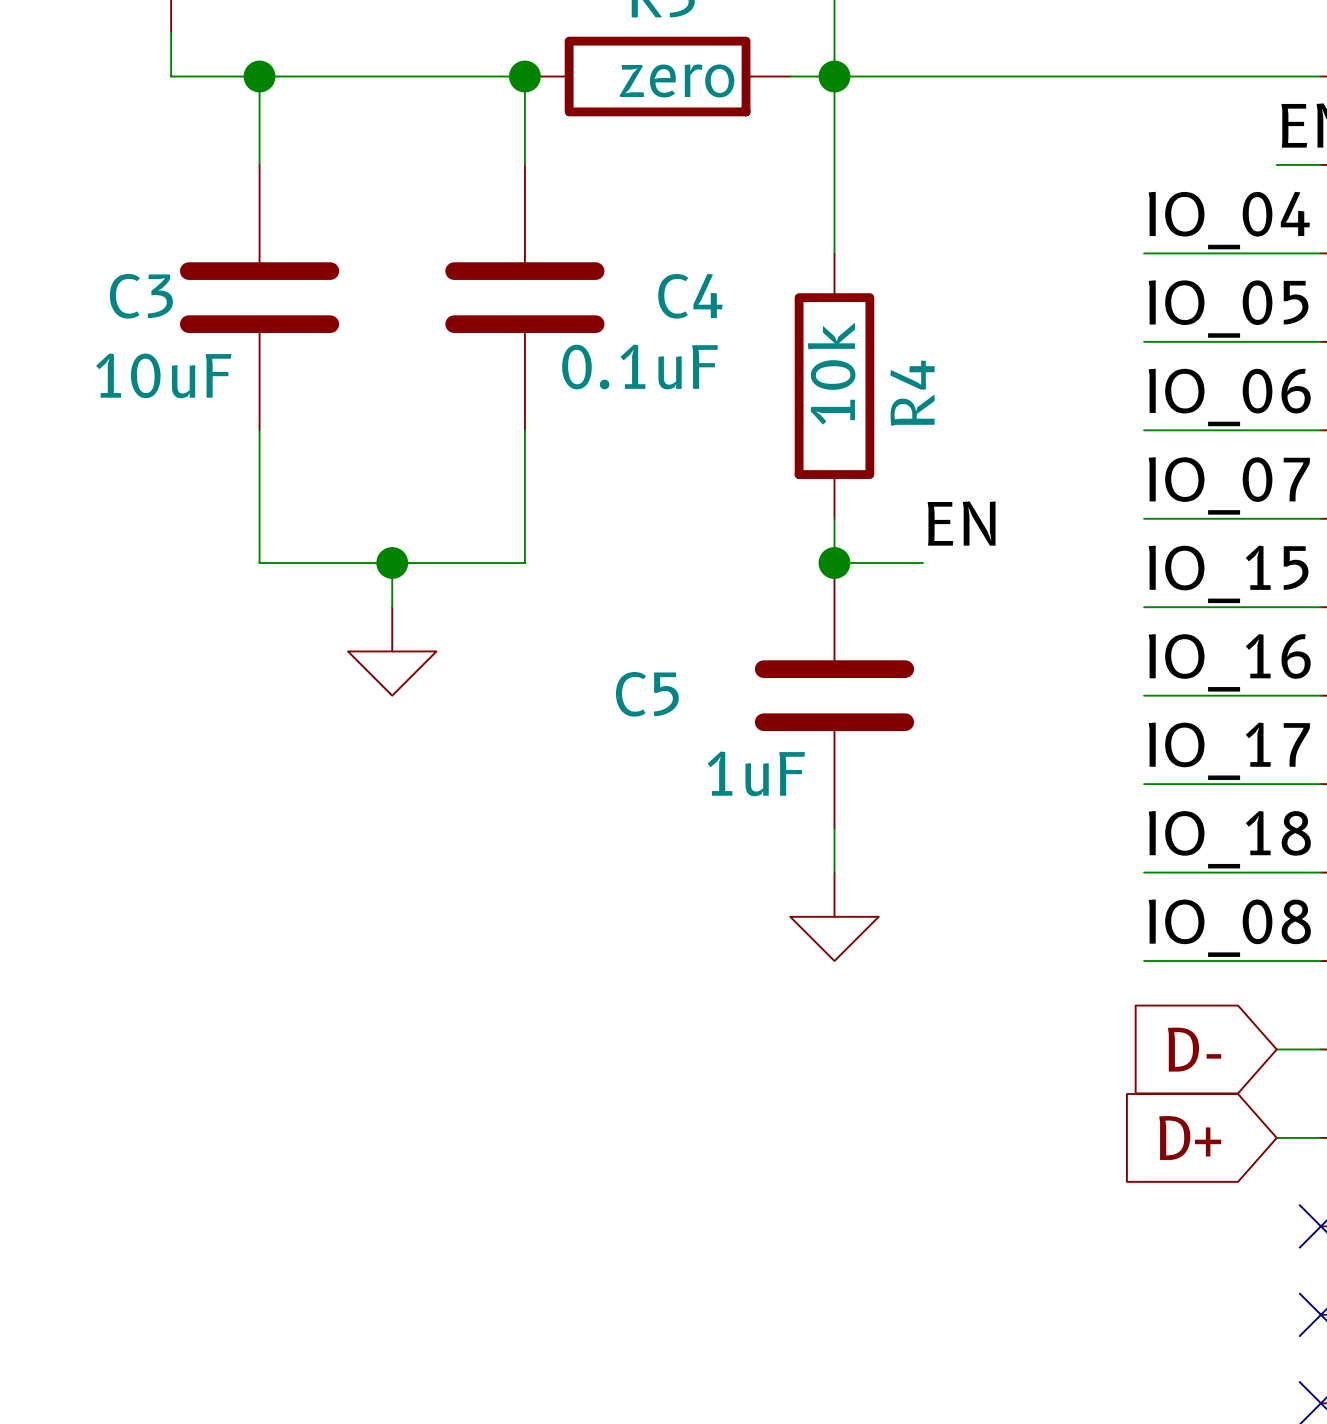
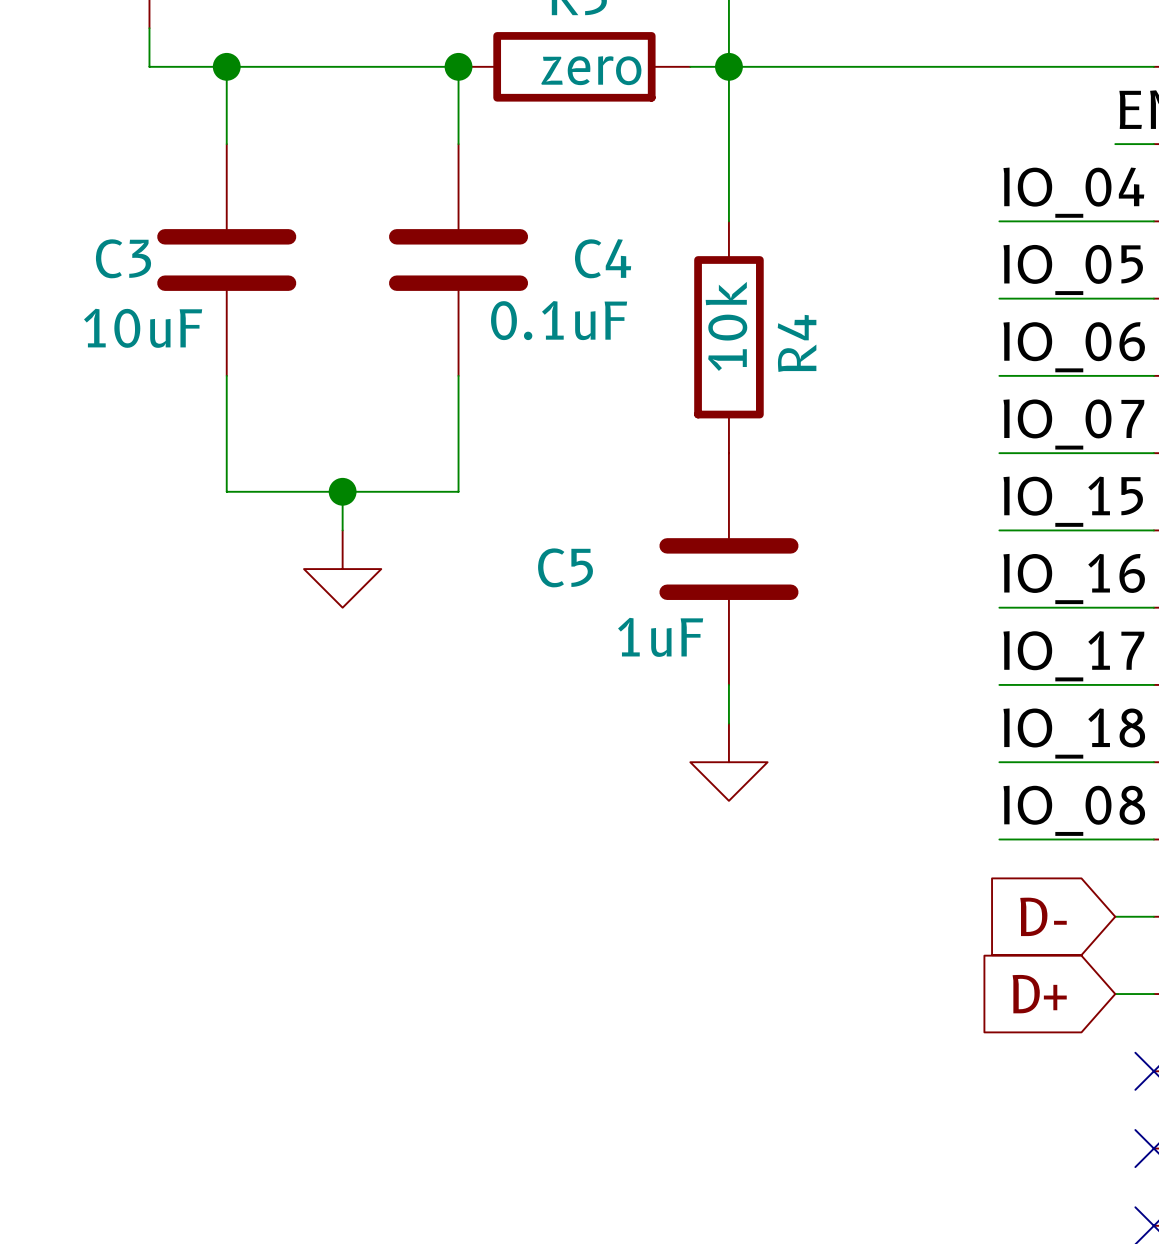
wire: (834, 518) (834, 562) (922, 562) -> none
label: EN (961, 523) -> none
junction: (834, 562) -> none
C5 position: (834, 695) -> (728, 569)
power symbol position: (834, 916) -> (728, 762)

